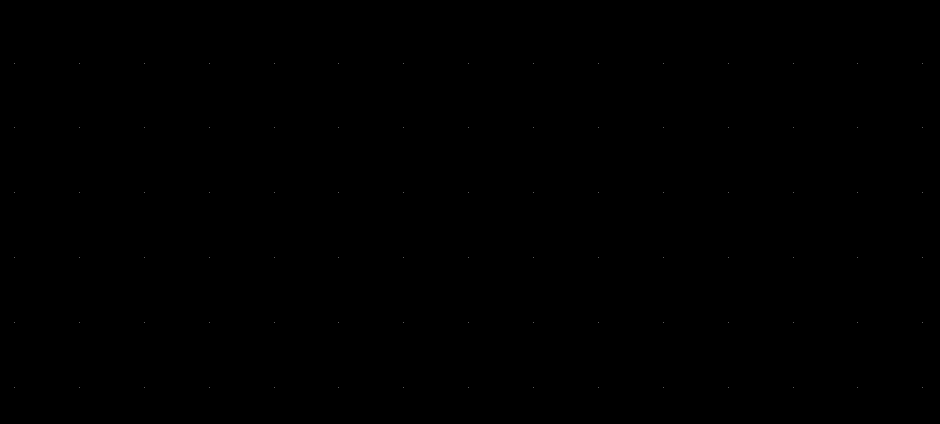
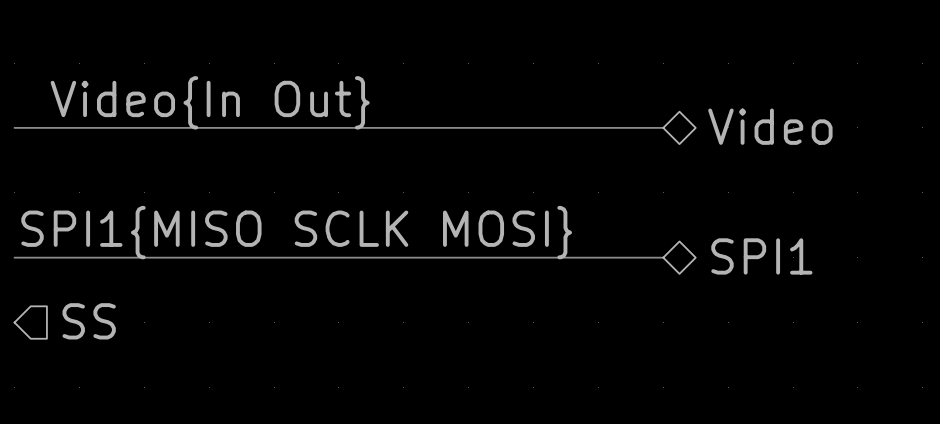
label: none -> Video{In Out} (210, 102)
hierarchical label: none -> Video (770, 126)
bus: none -> (14, 127) (663, 127)
label: none -> SPI1{MISO SCLK MOSI} (296, 232)
hierarchical label: none -> SPI1 (761, 256)
bus: none -> (14, 257) (663, 257)
hierarchical label: none -> SS (89, 321)

